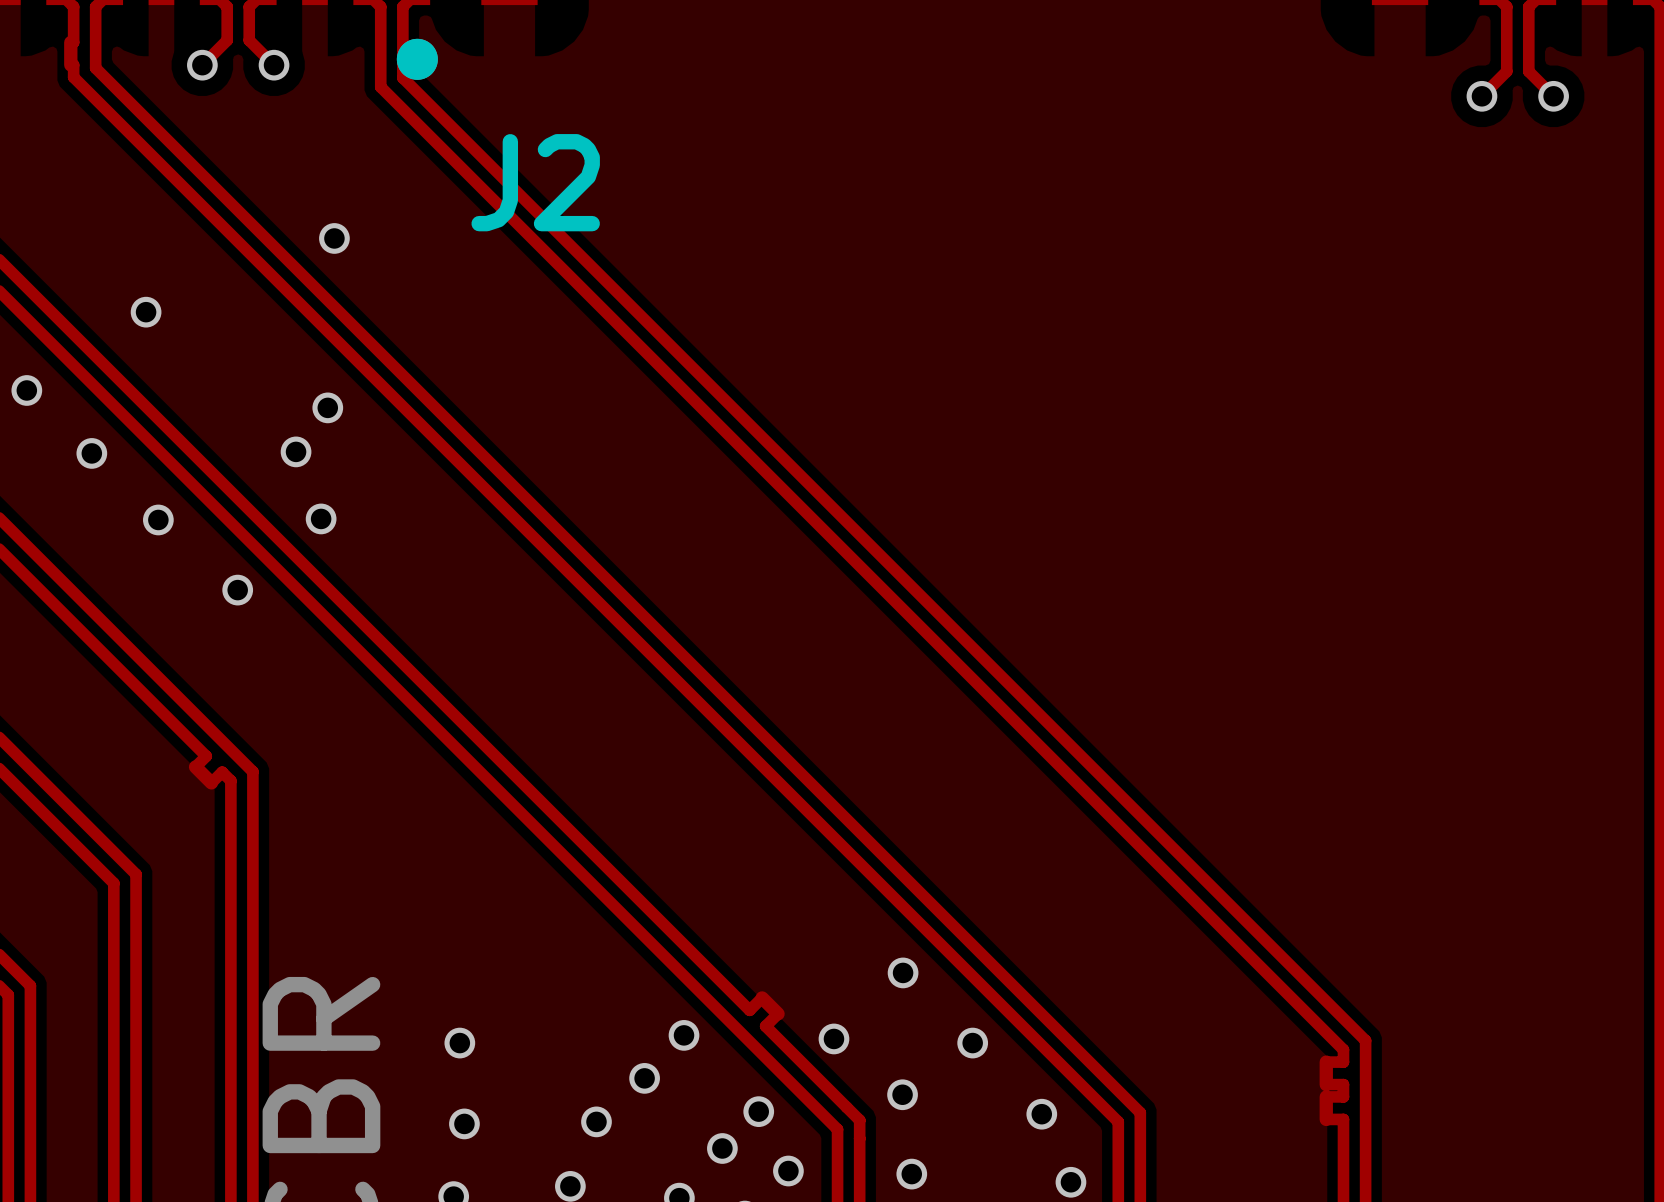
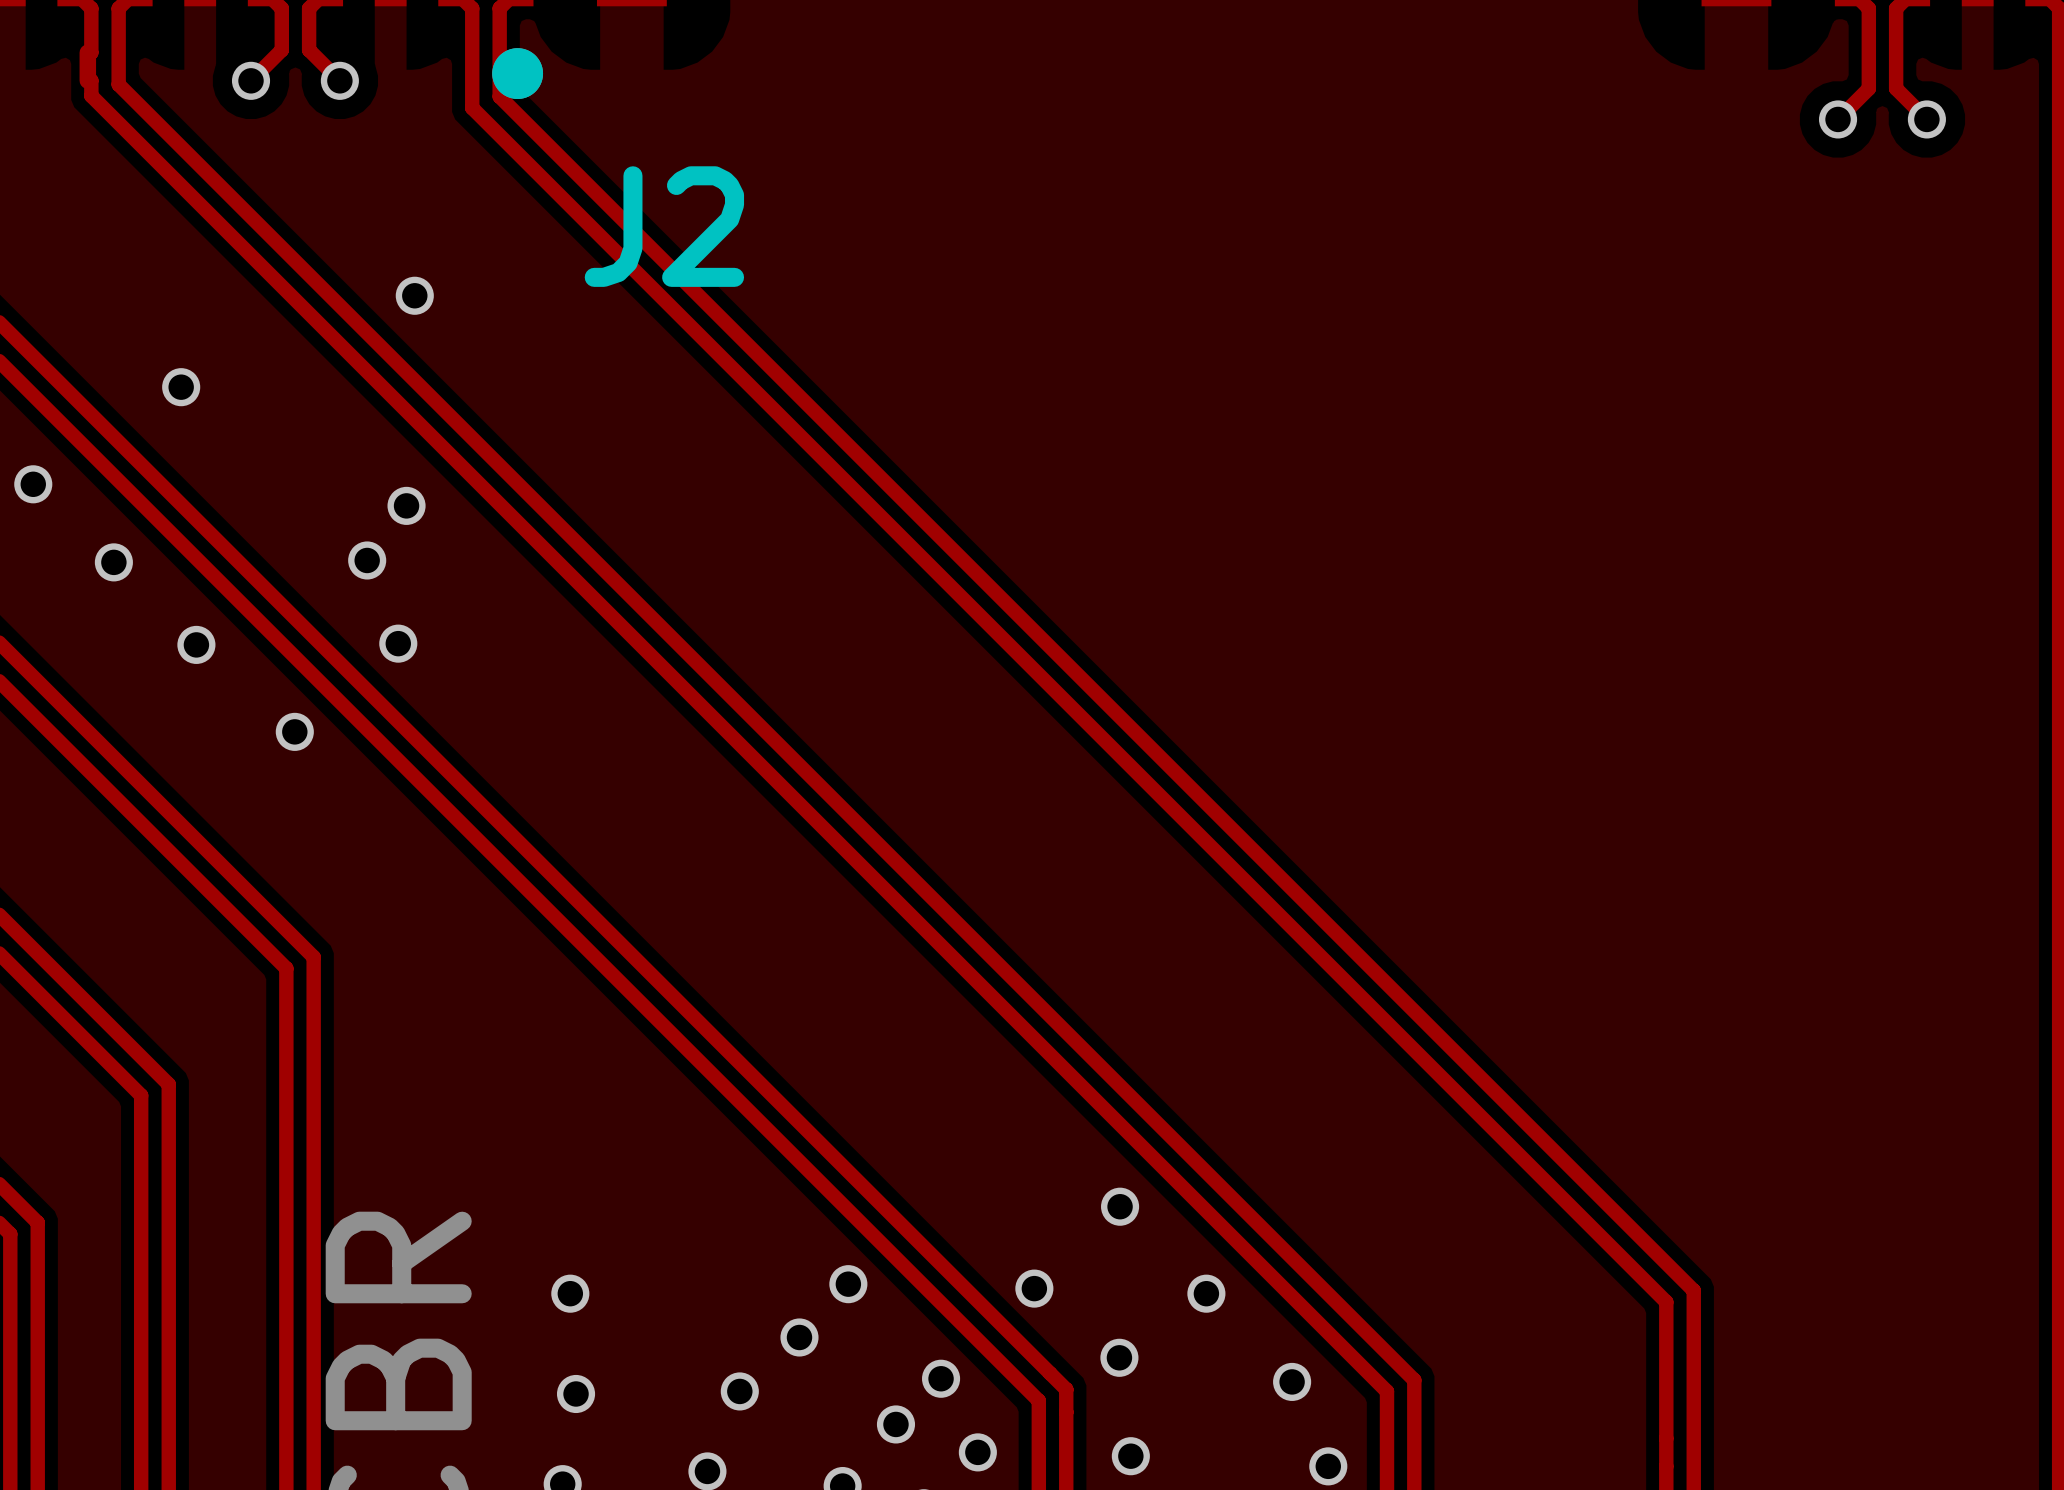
track: (206, 756) (195, 766) (211, 782) (222, 772) -> (255, 937) (275, 957)
track: (749, 1010) (762, 997) (778, 1013) (765, 1026) -> (929, 1253) (949, 1272)
track: (1343, 1062) (1326, 1062) (1326, 1084) (1343, 1084) -> (1666, 1317) (1666, 1345)
track: (1343, 1096) (1326, 1096) (1326, 1119) (1343, 1119) -> (1666, 1360) (1666, 1388)

